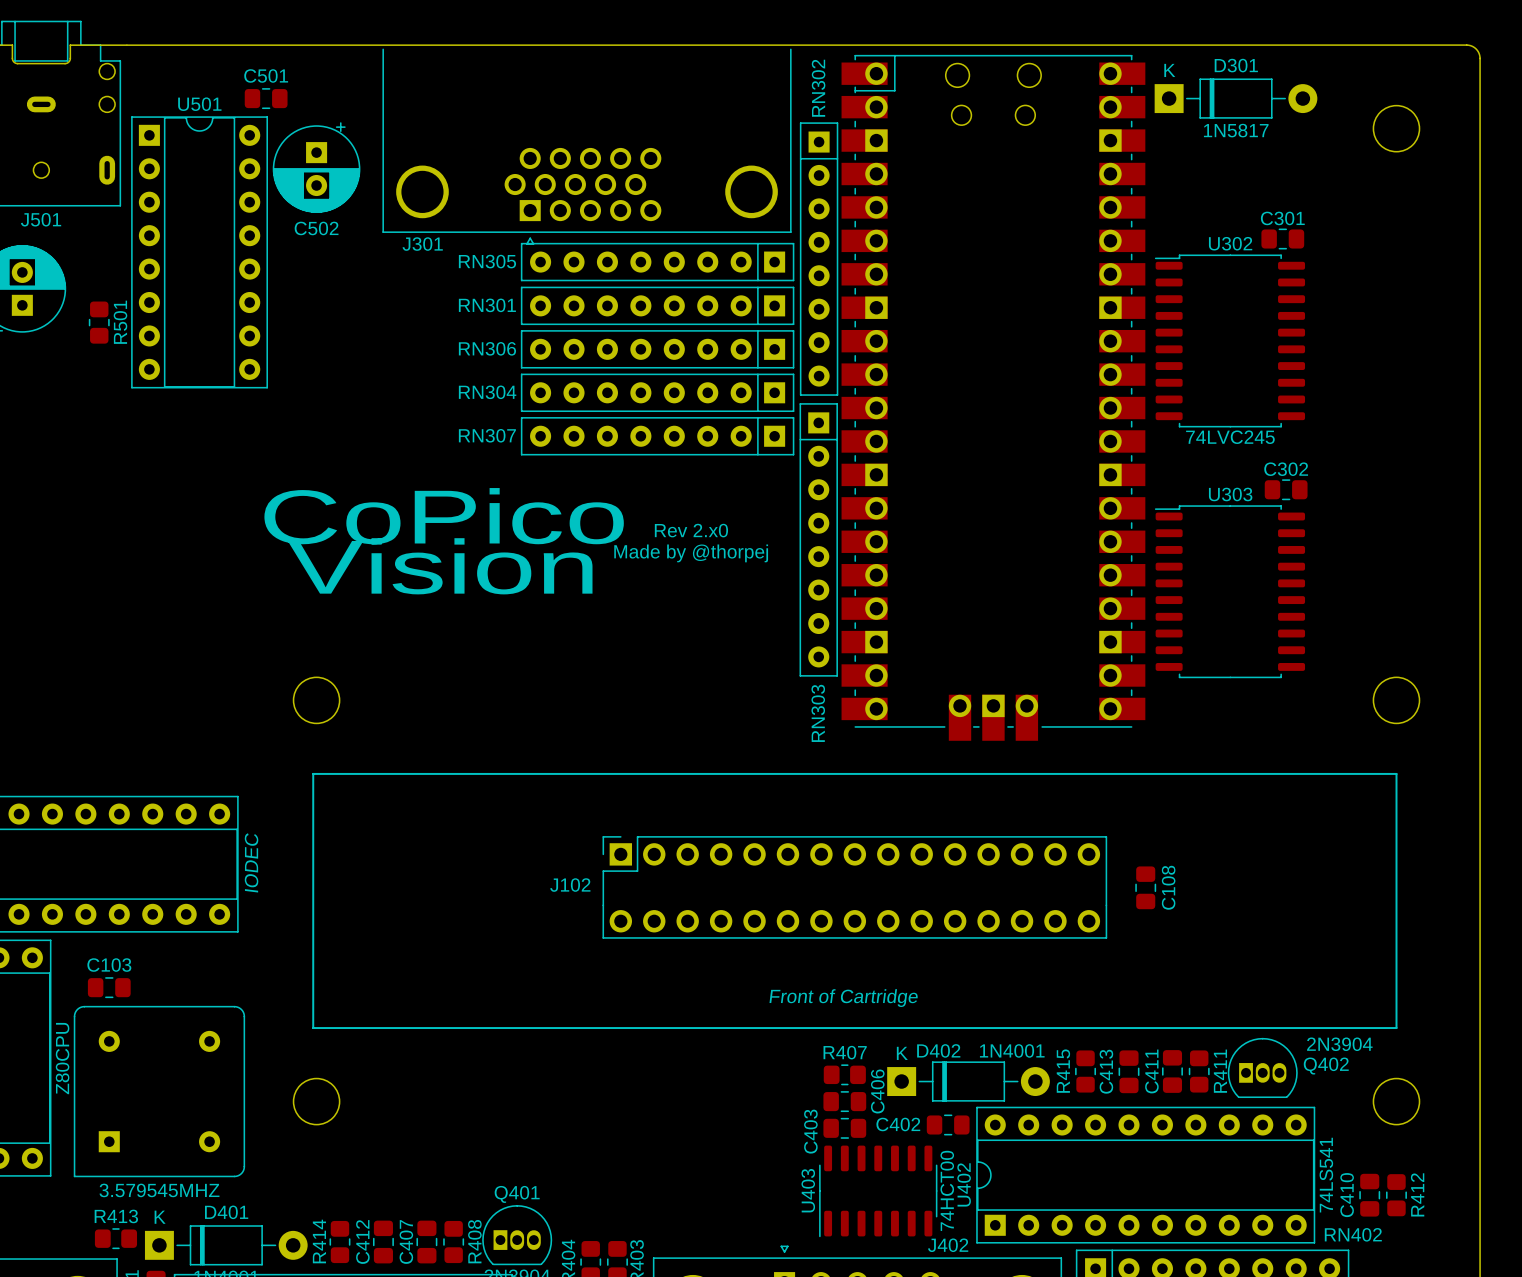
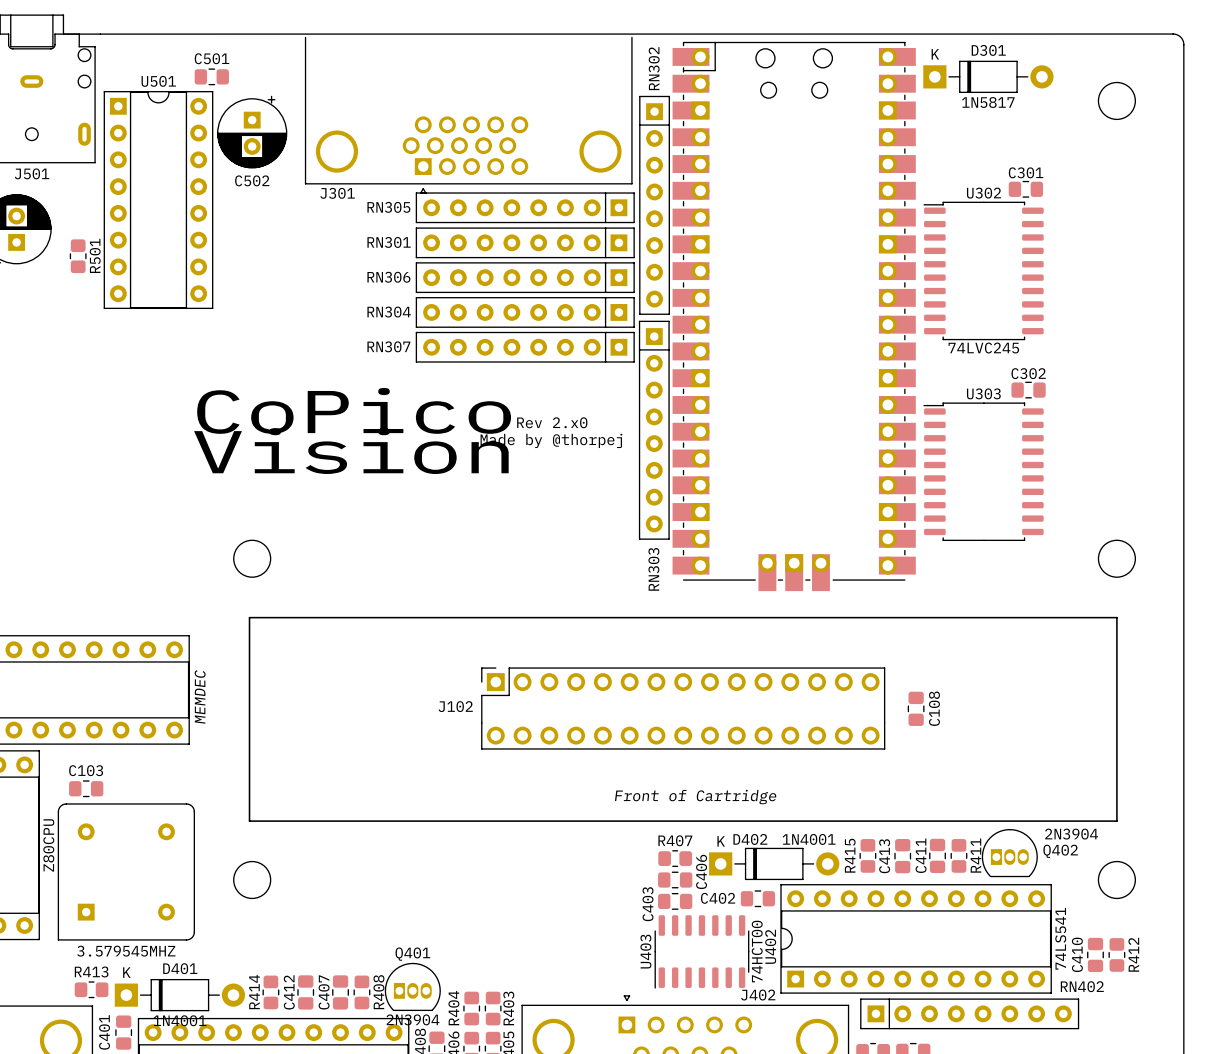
text: IODEC (251, 862) -> none
text: none -> MEMDEC (200, 696)

